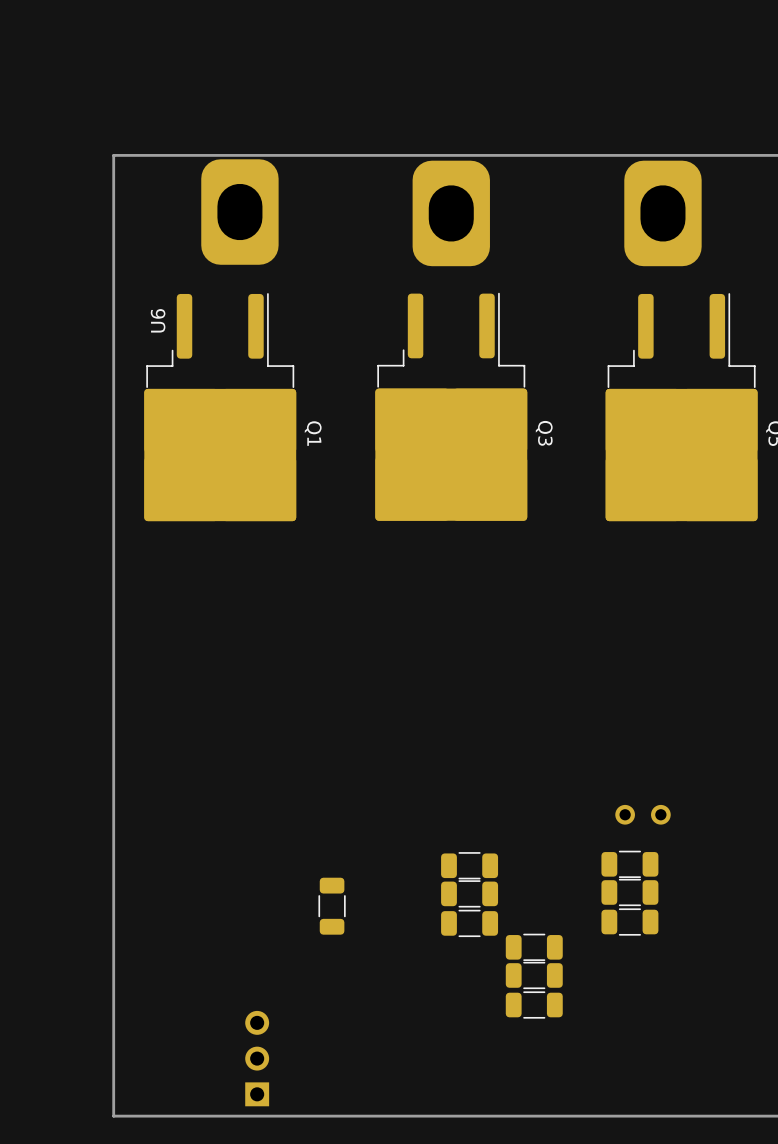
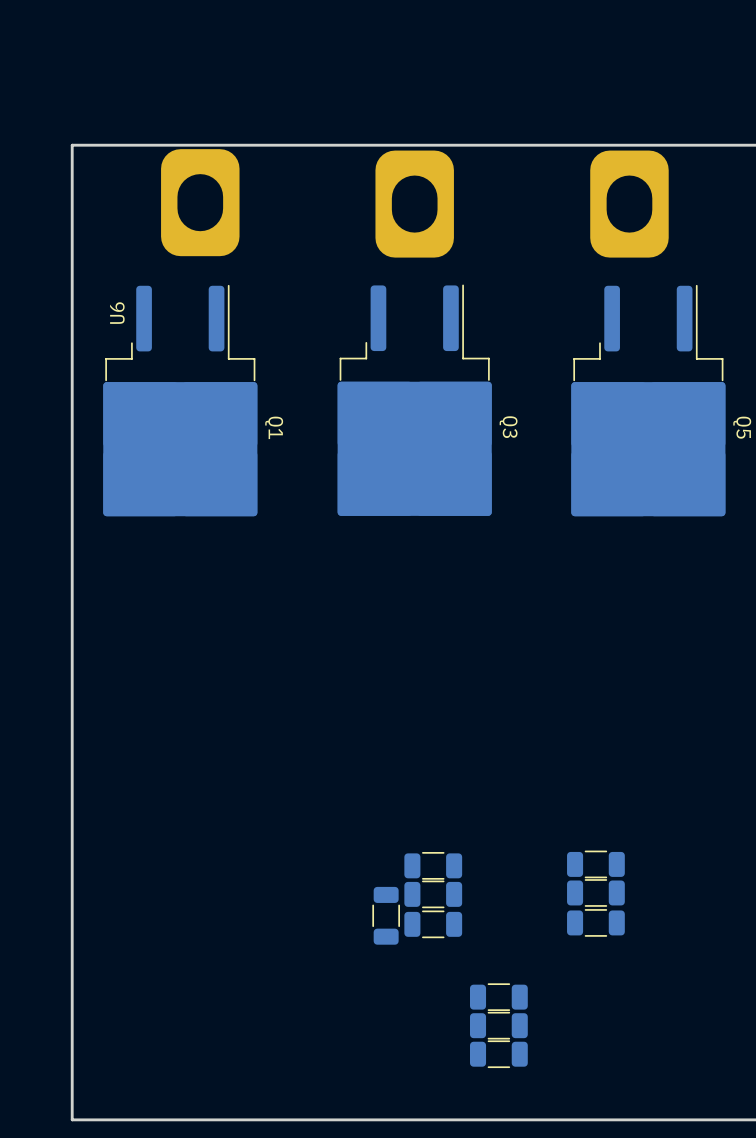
part: (643, 814) -> none
part: (332, 906) -> none
part: none -> (386, 915)
part: (534, 947) -> none
part: (534, 975) -> none
part: none -> (498, 997)
part: (534, 1005) -> none
part: none -> (498, 1025)
part: none -> (498, 1054)
part: (257, 1058) -> none

